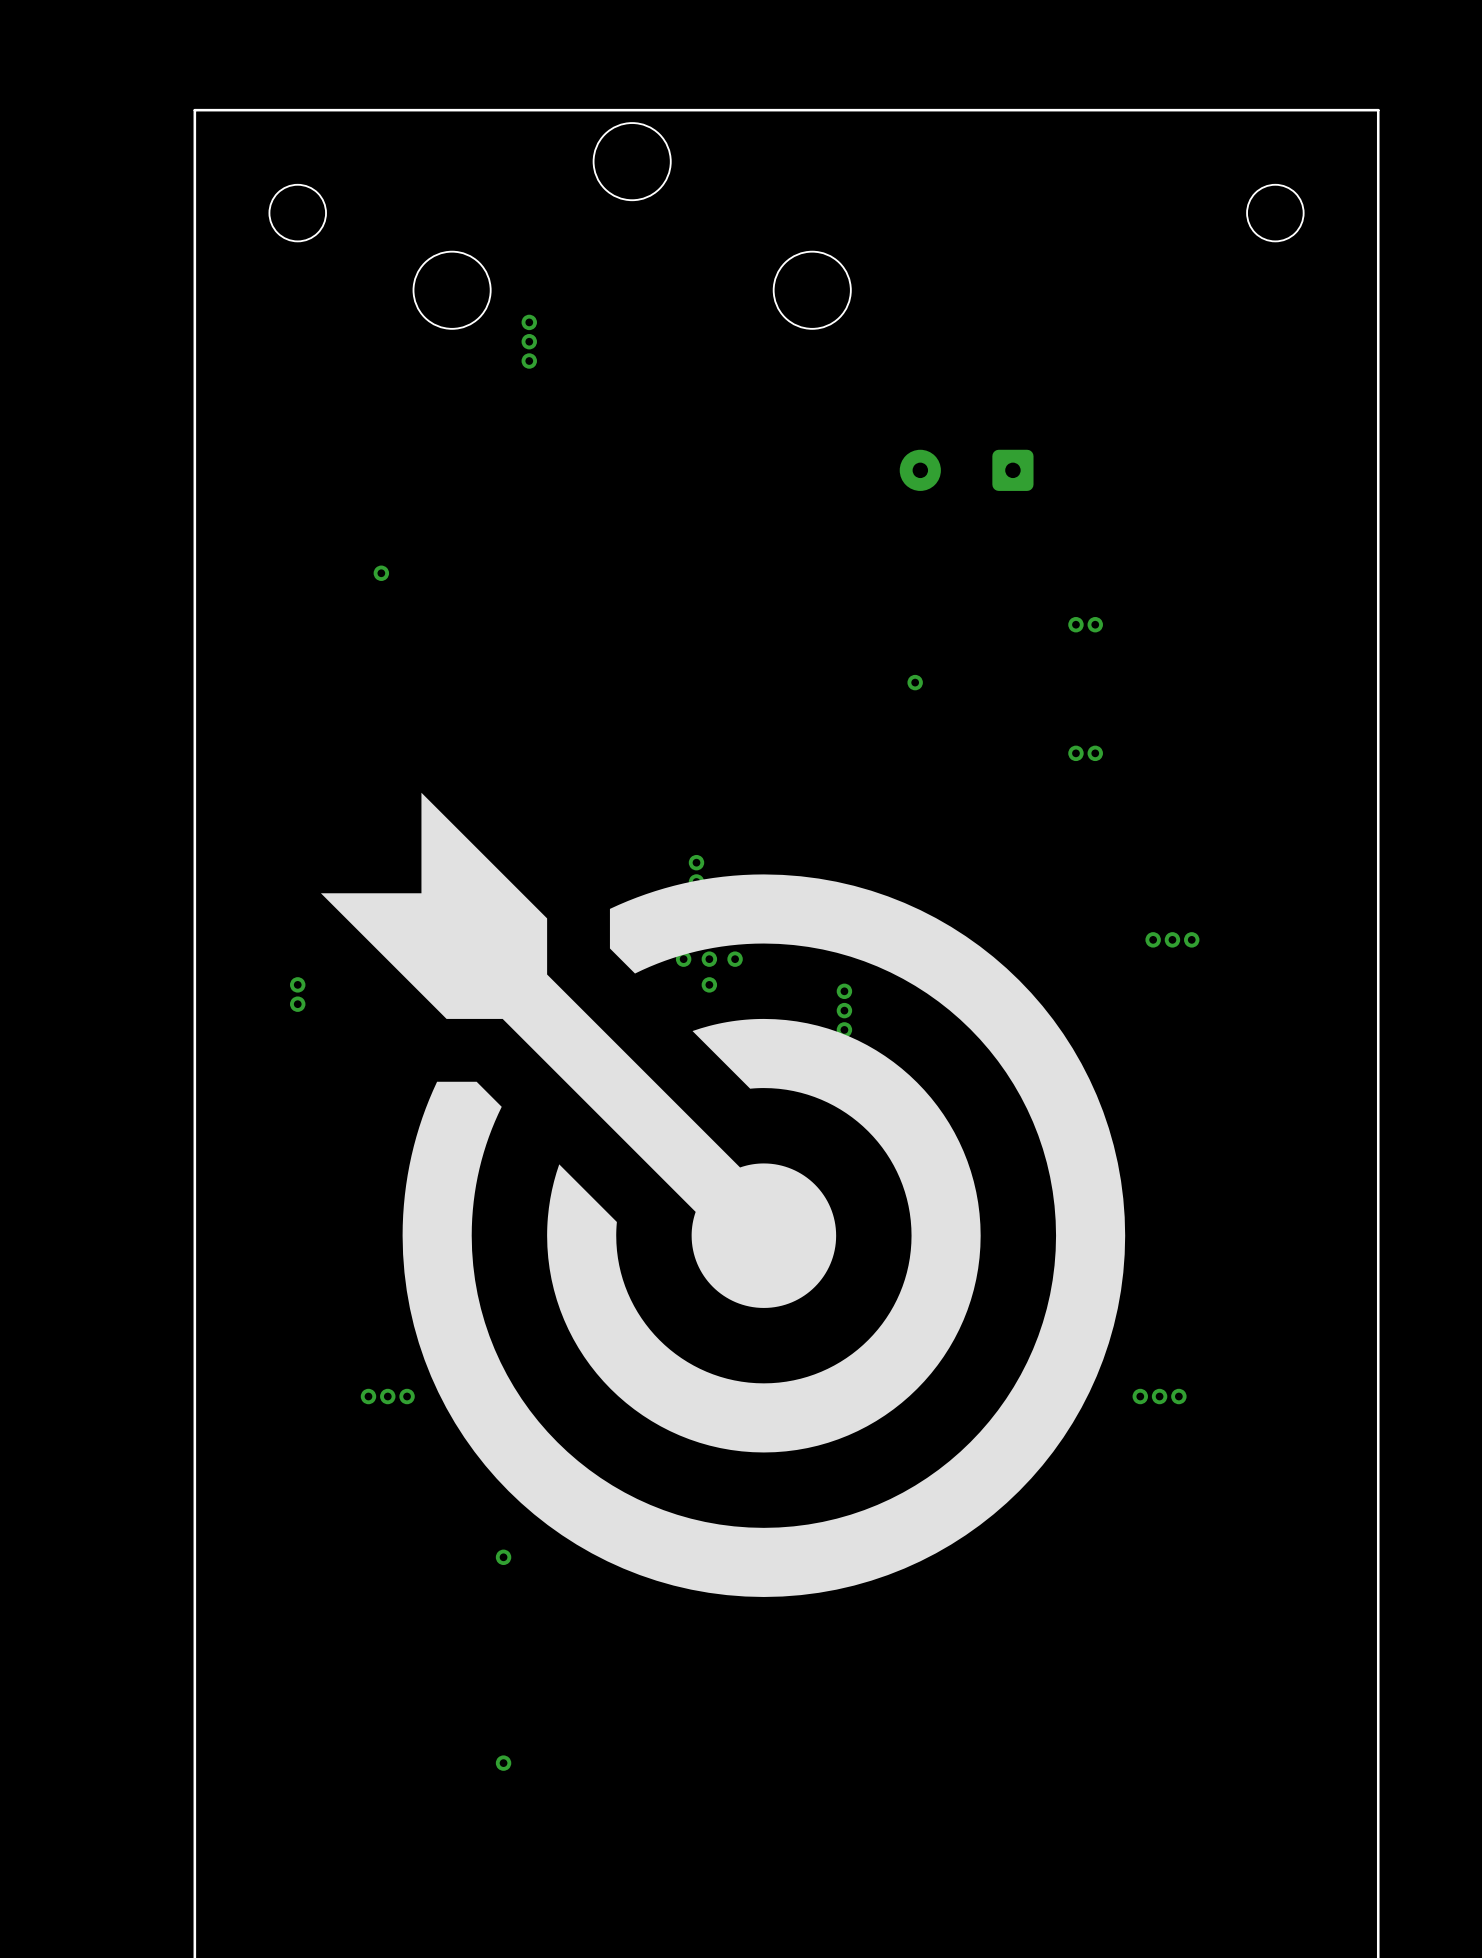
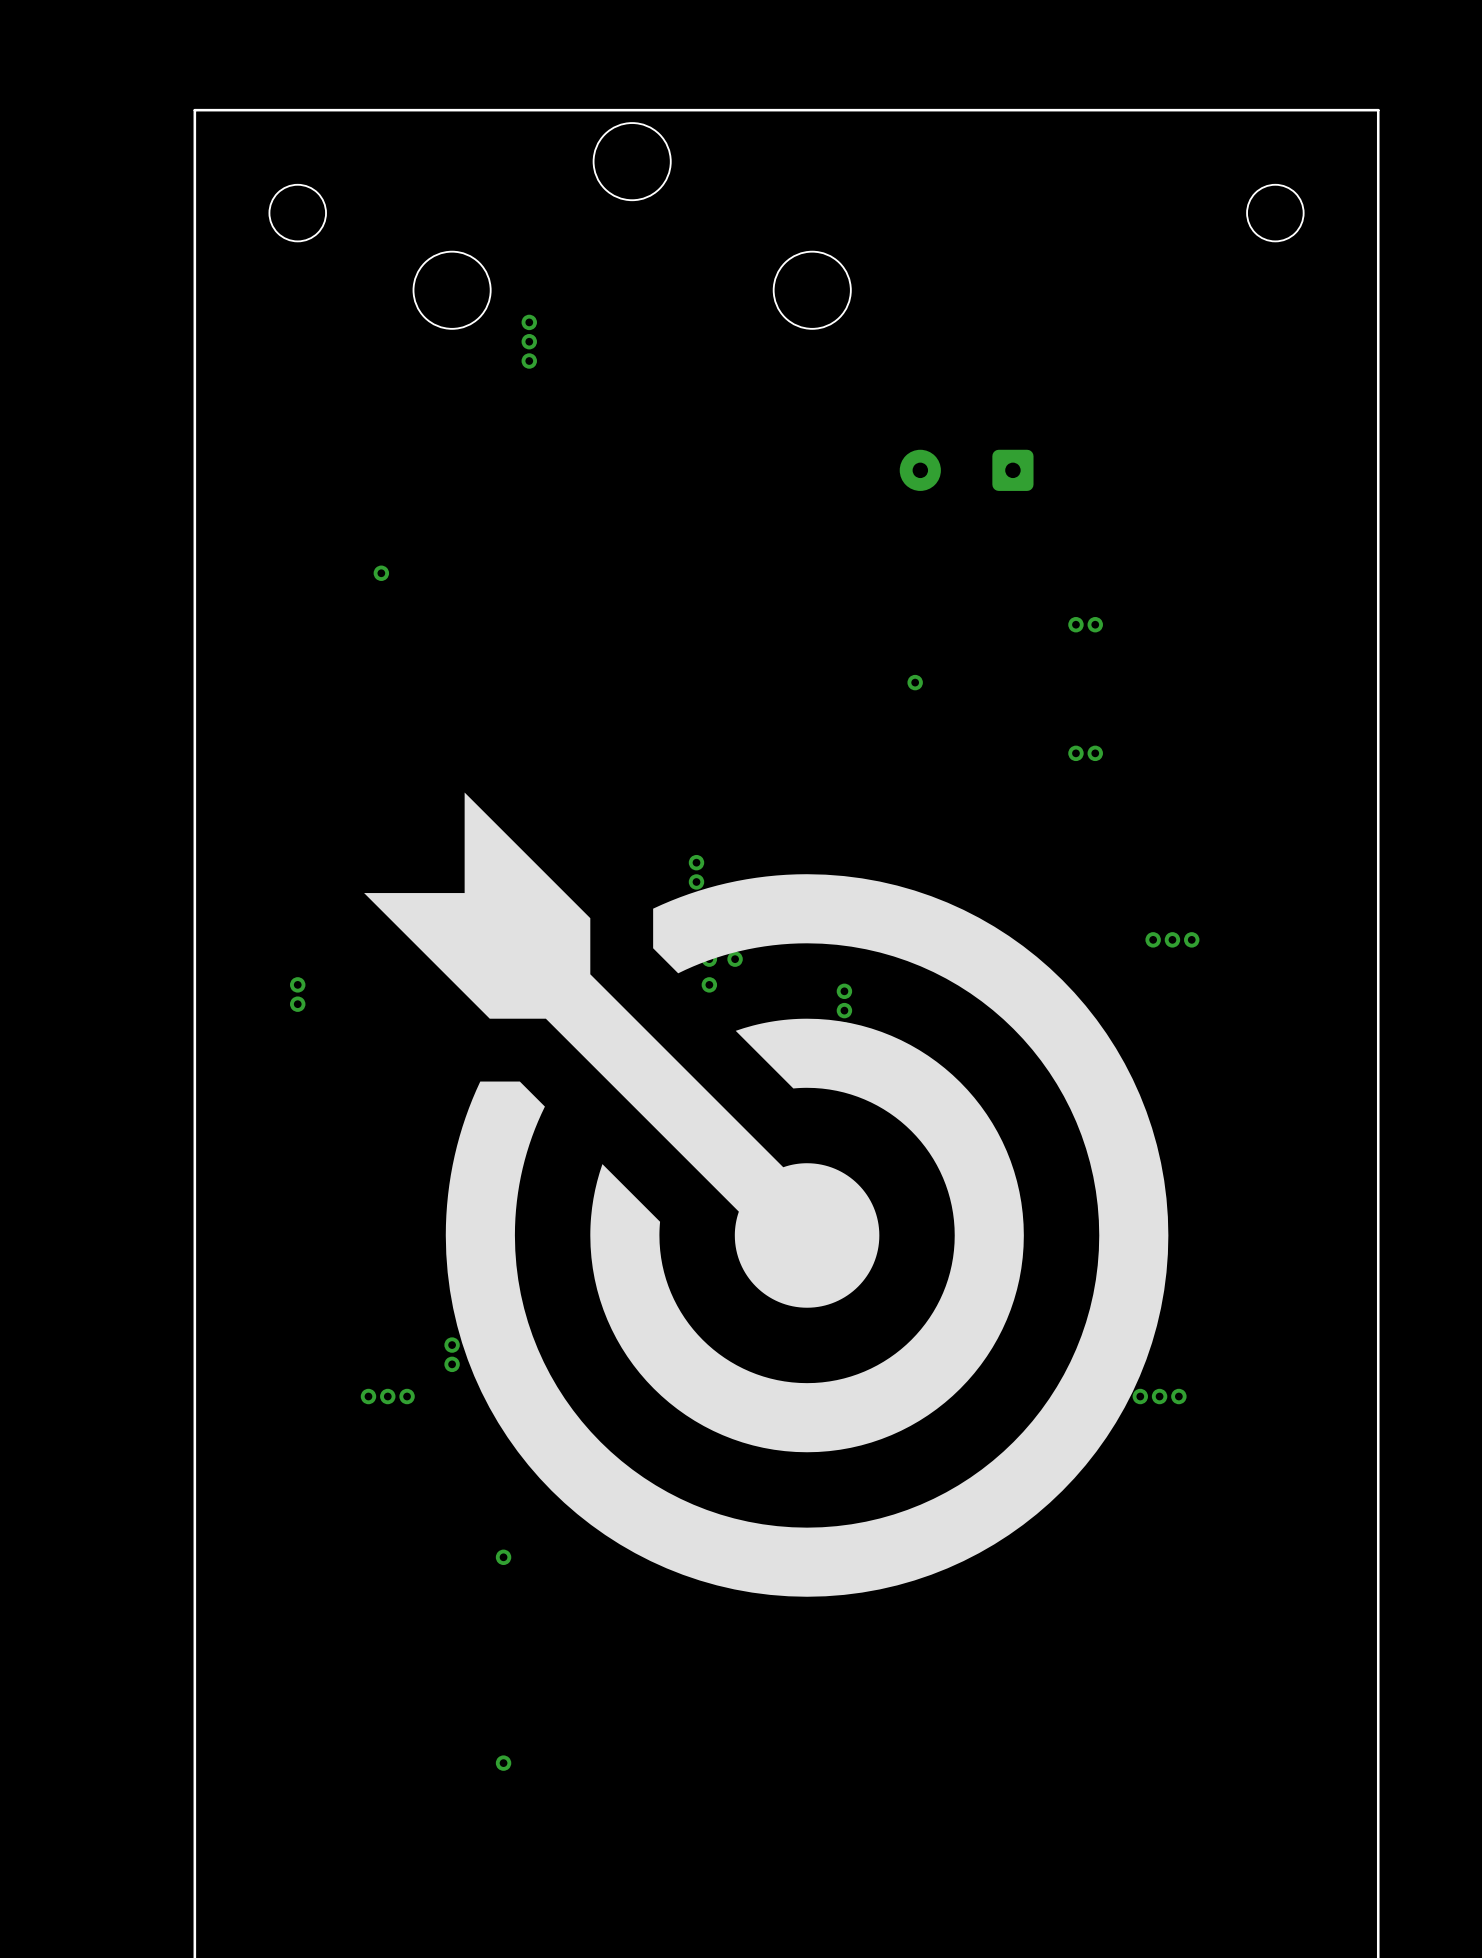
drawing position: (578, 1050) -> (621, 1050)
drawing position: (763, 1235) -> (807, 1235)
drawing position: (763, 1235) -> (807, 1235)

